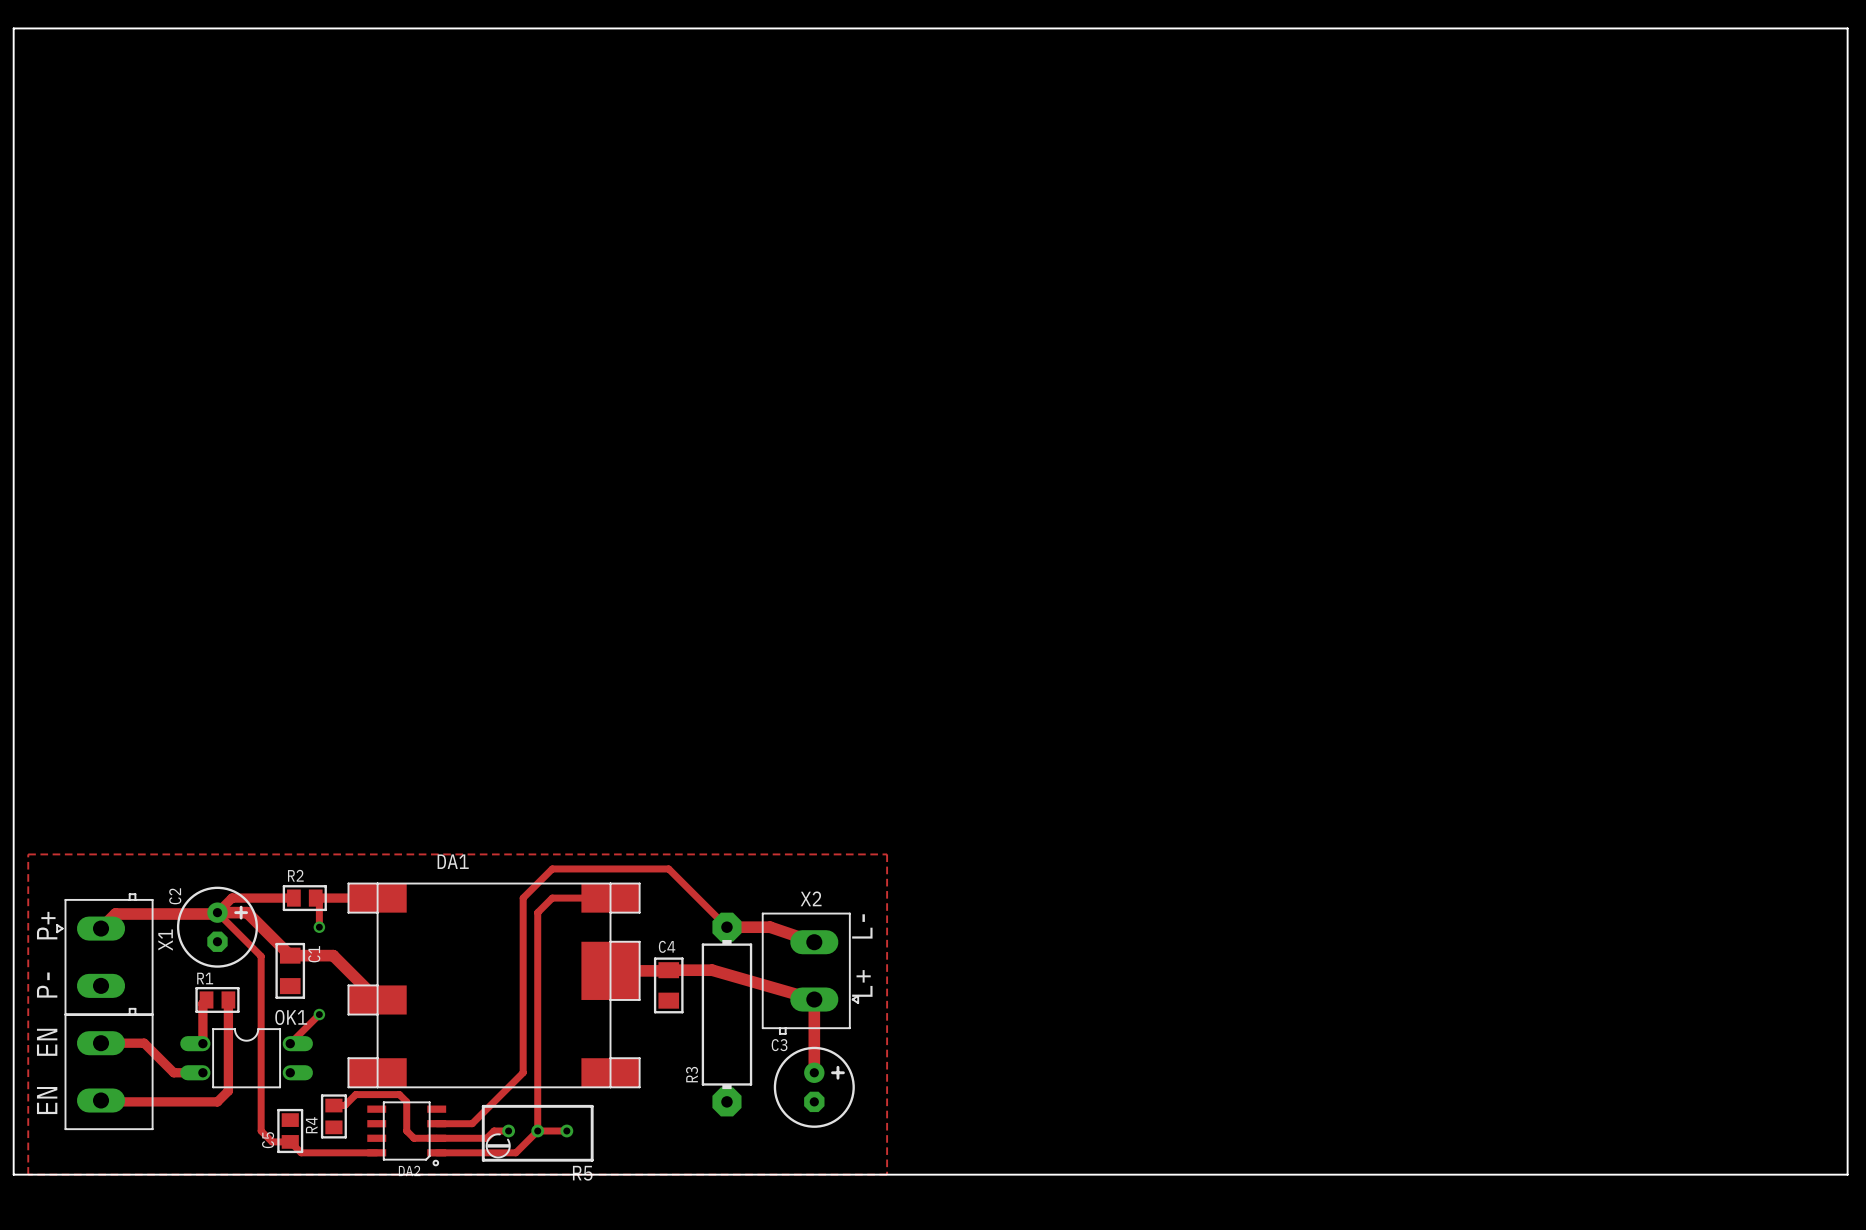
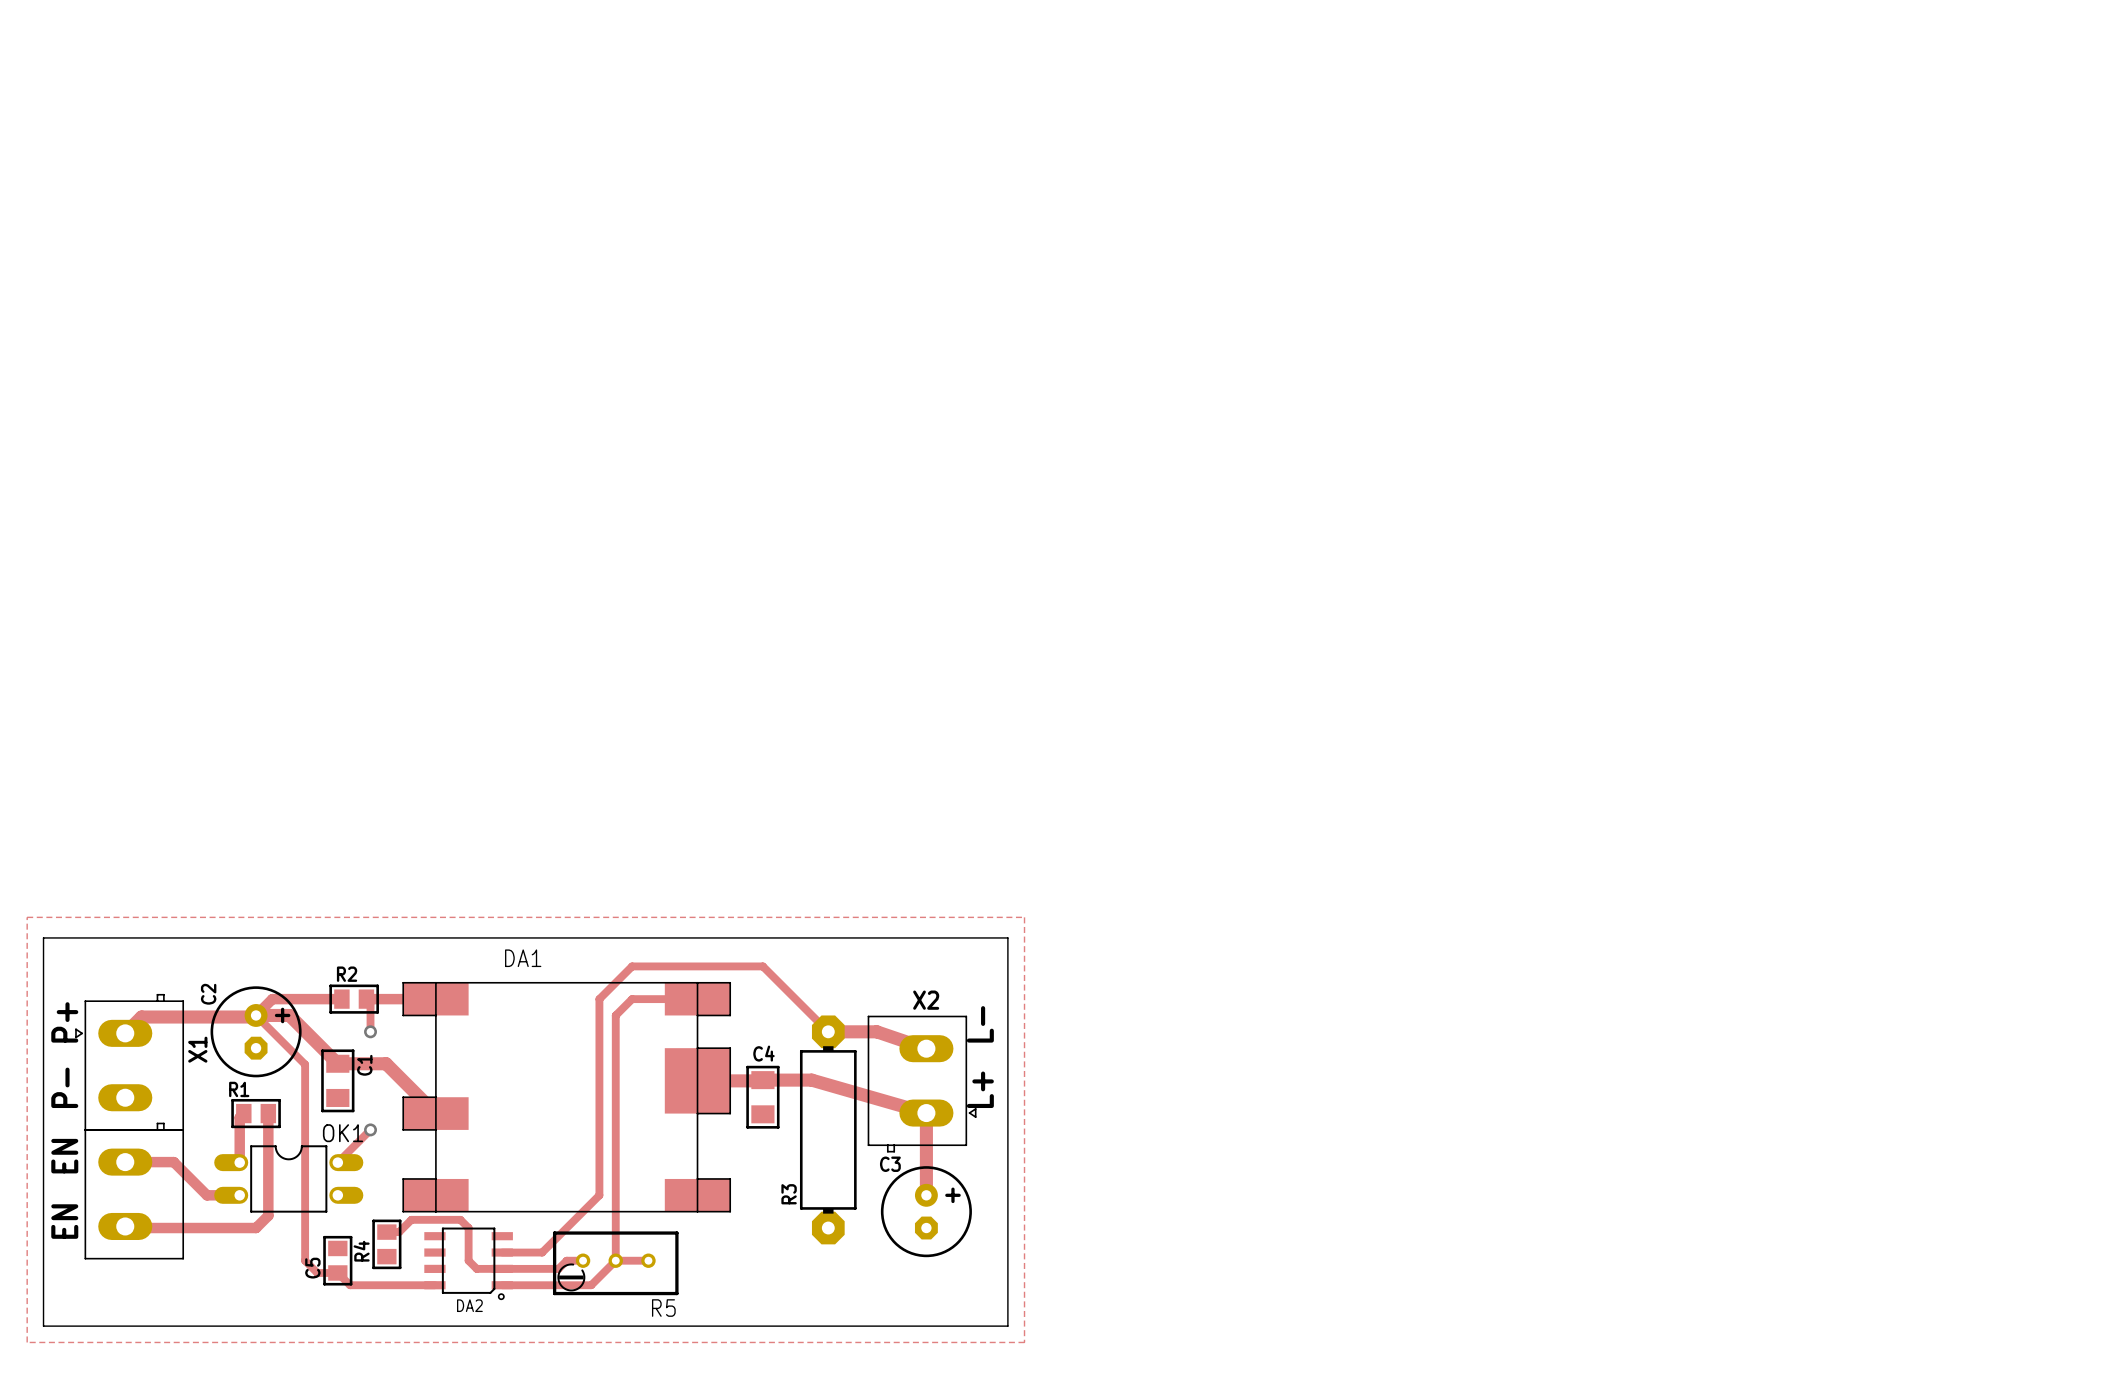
board edge: (13, 28) (1847, 28) (1847, 1174) (13, 1174) (13, 28) -> none
board edge: none -> (43, 937) (1007, 937) (1007, 1326) (43, 1326) (43, 937)
zone outline: (28, 854) (887, 854) (887, 1174) (28, 1174) (28, 854) -> (27, 917) (27, 1342) (1024, 1342) (1024, 917) (27, 917)

